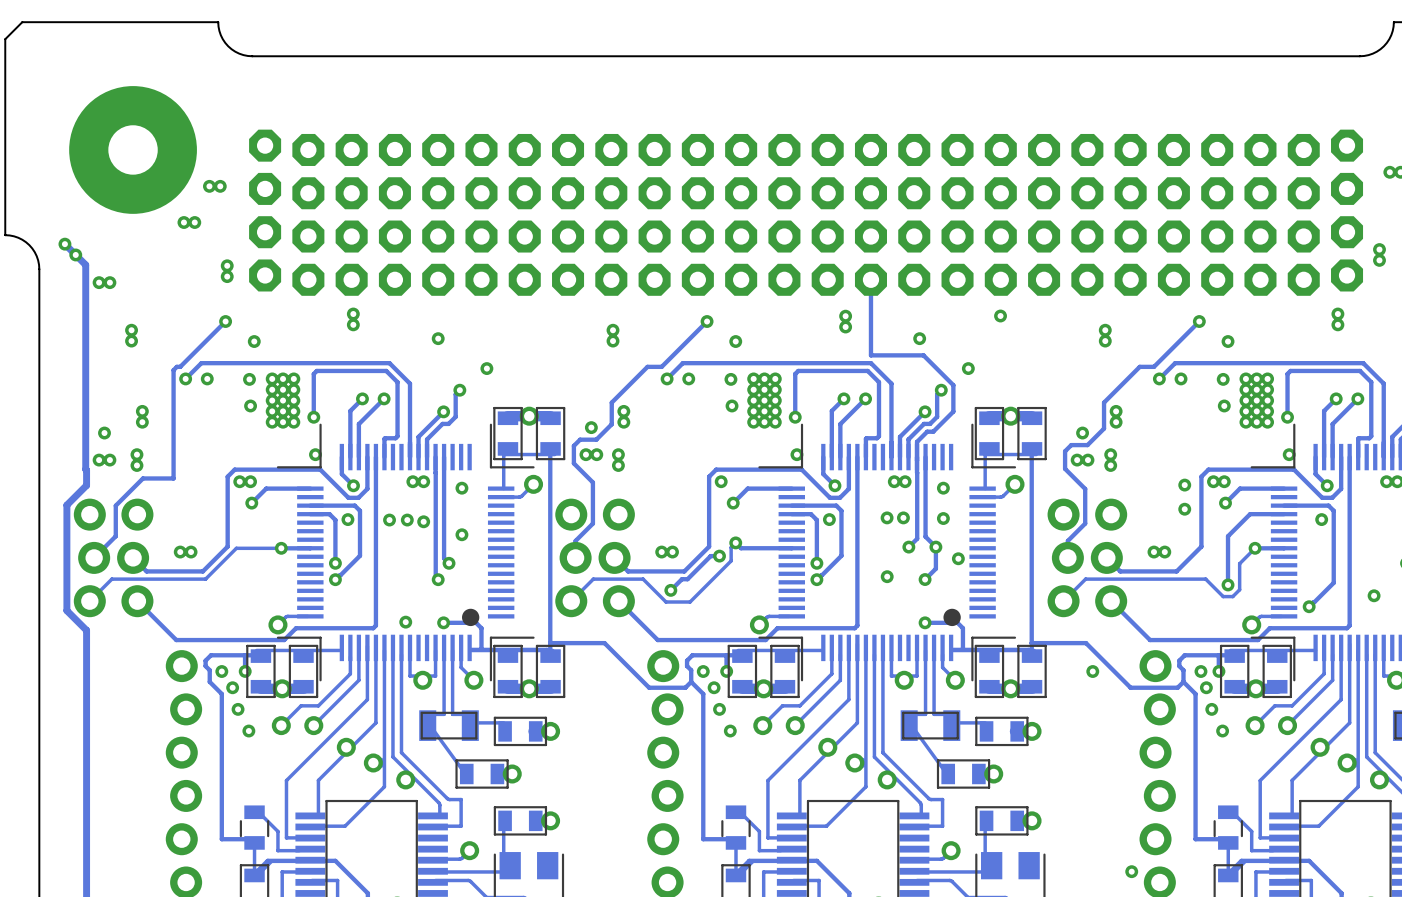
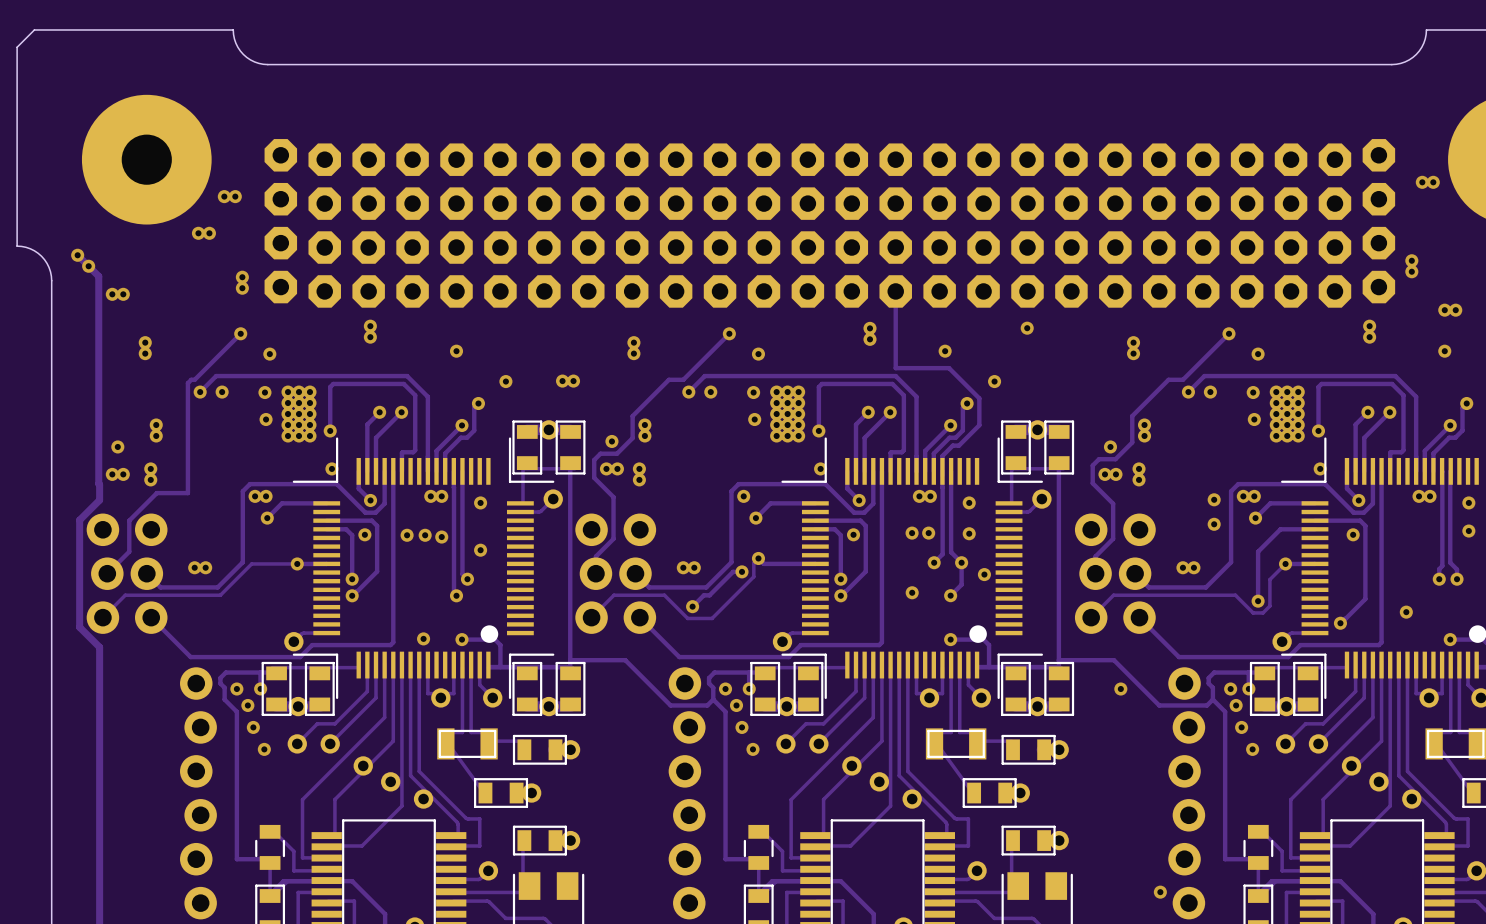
via: none -> (562, 381)
via: none -> (573, 381)

